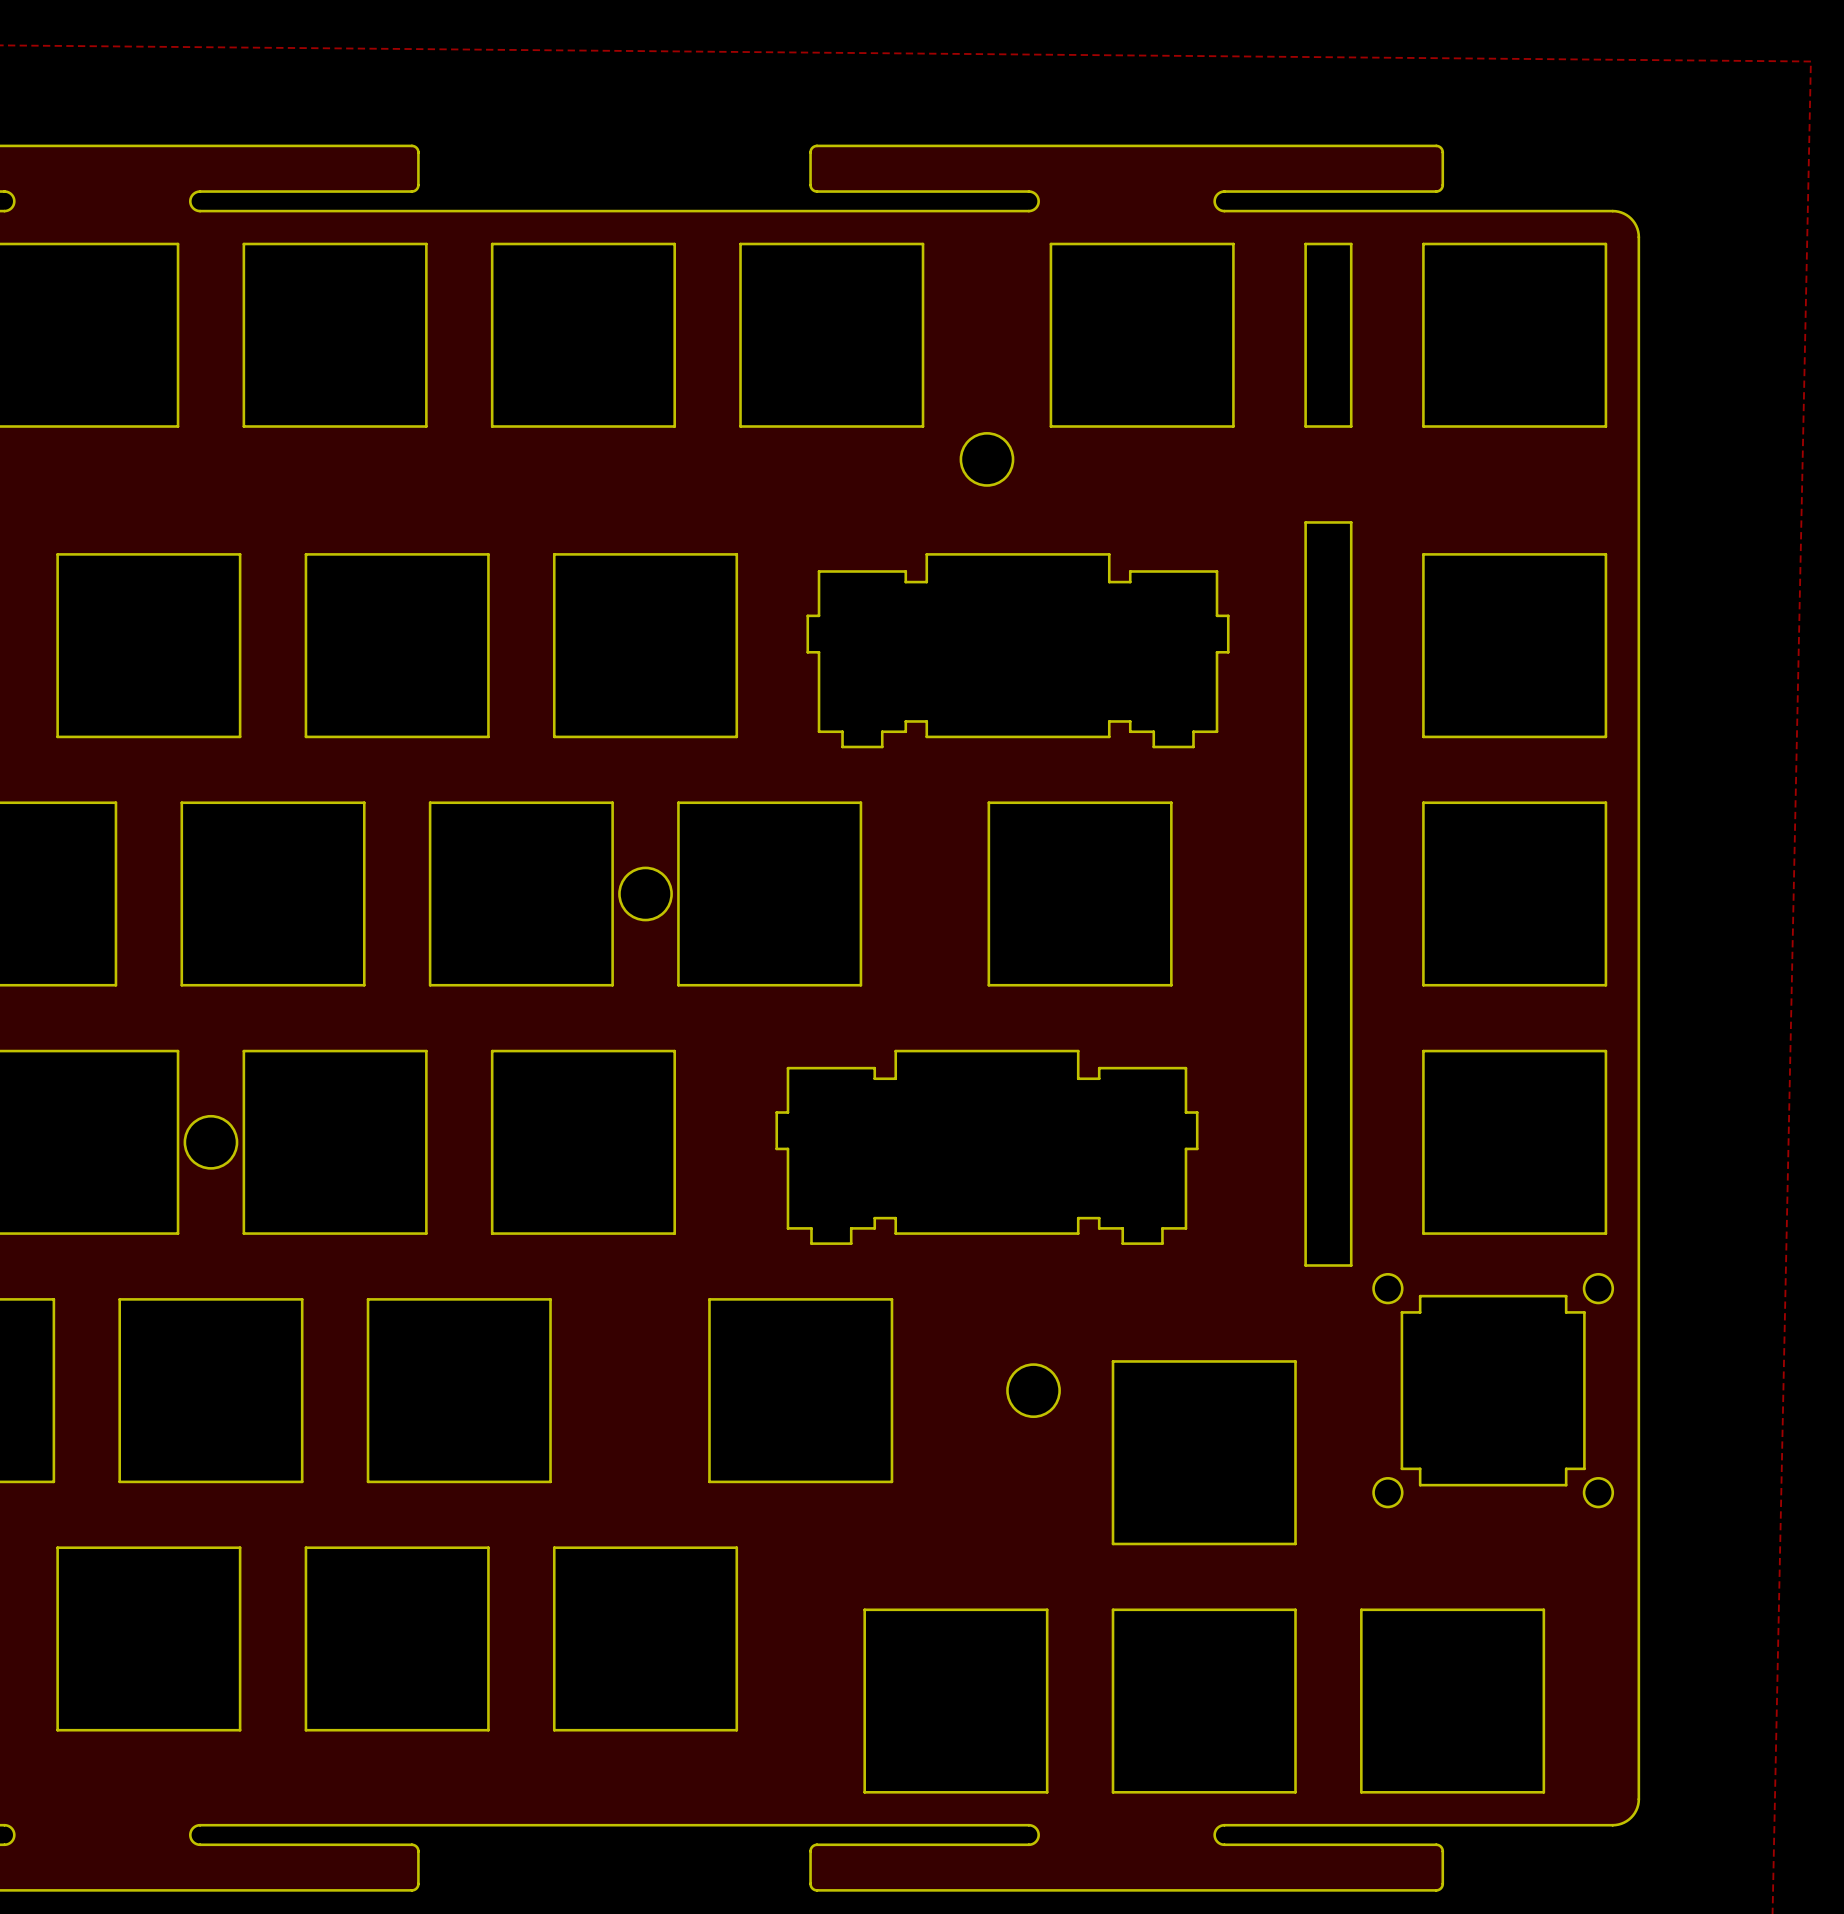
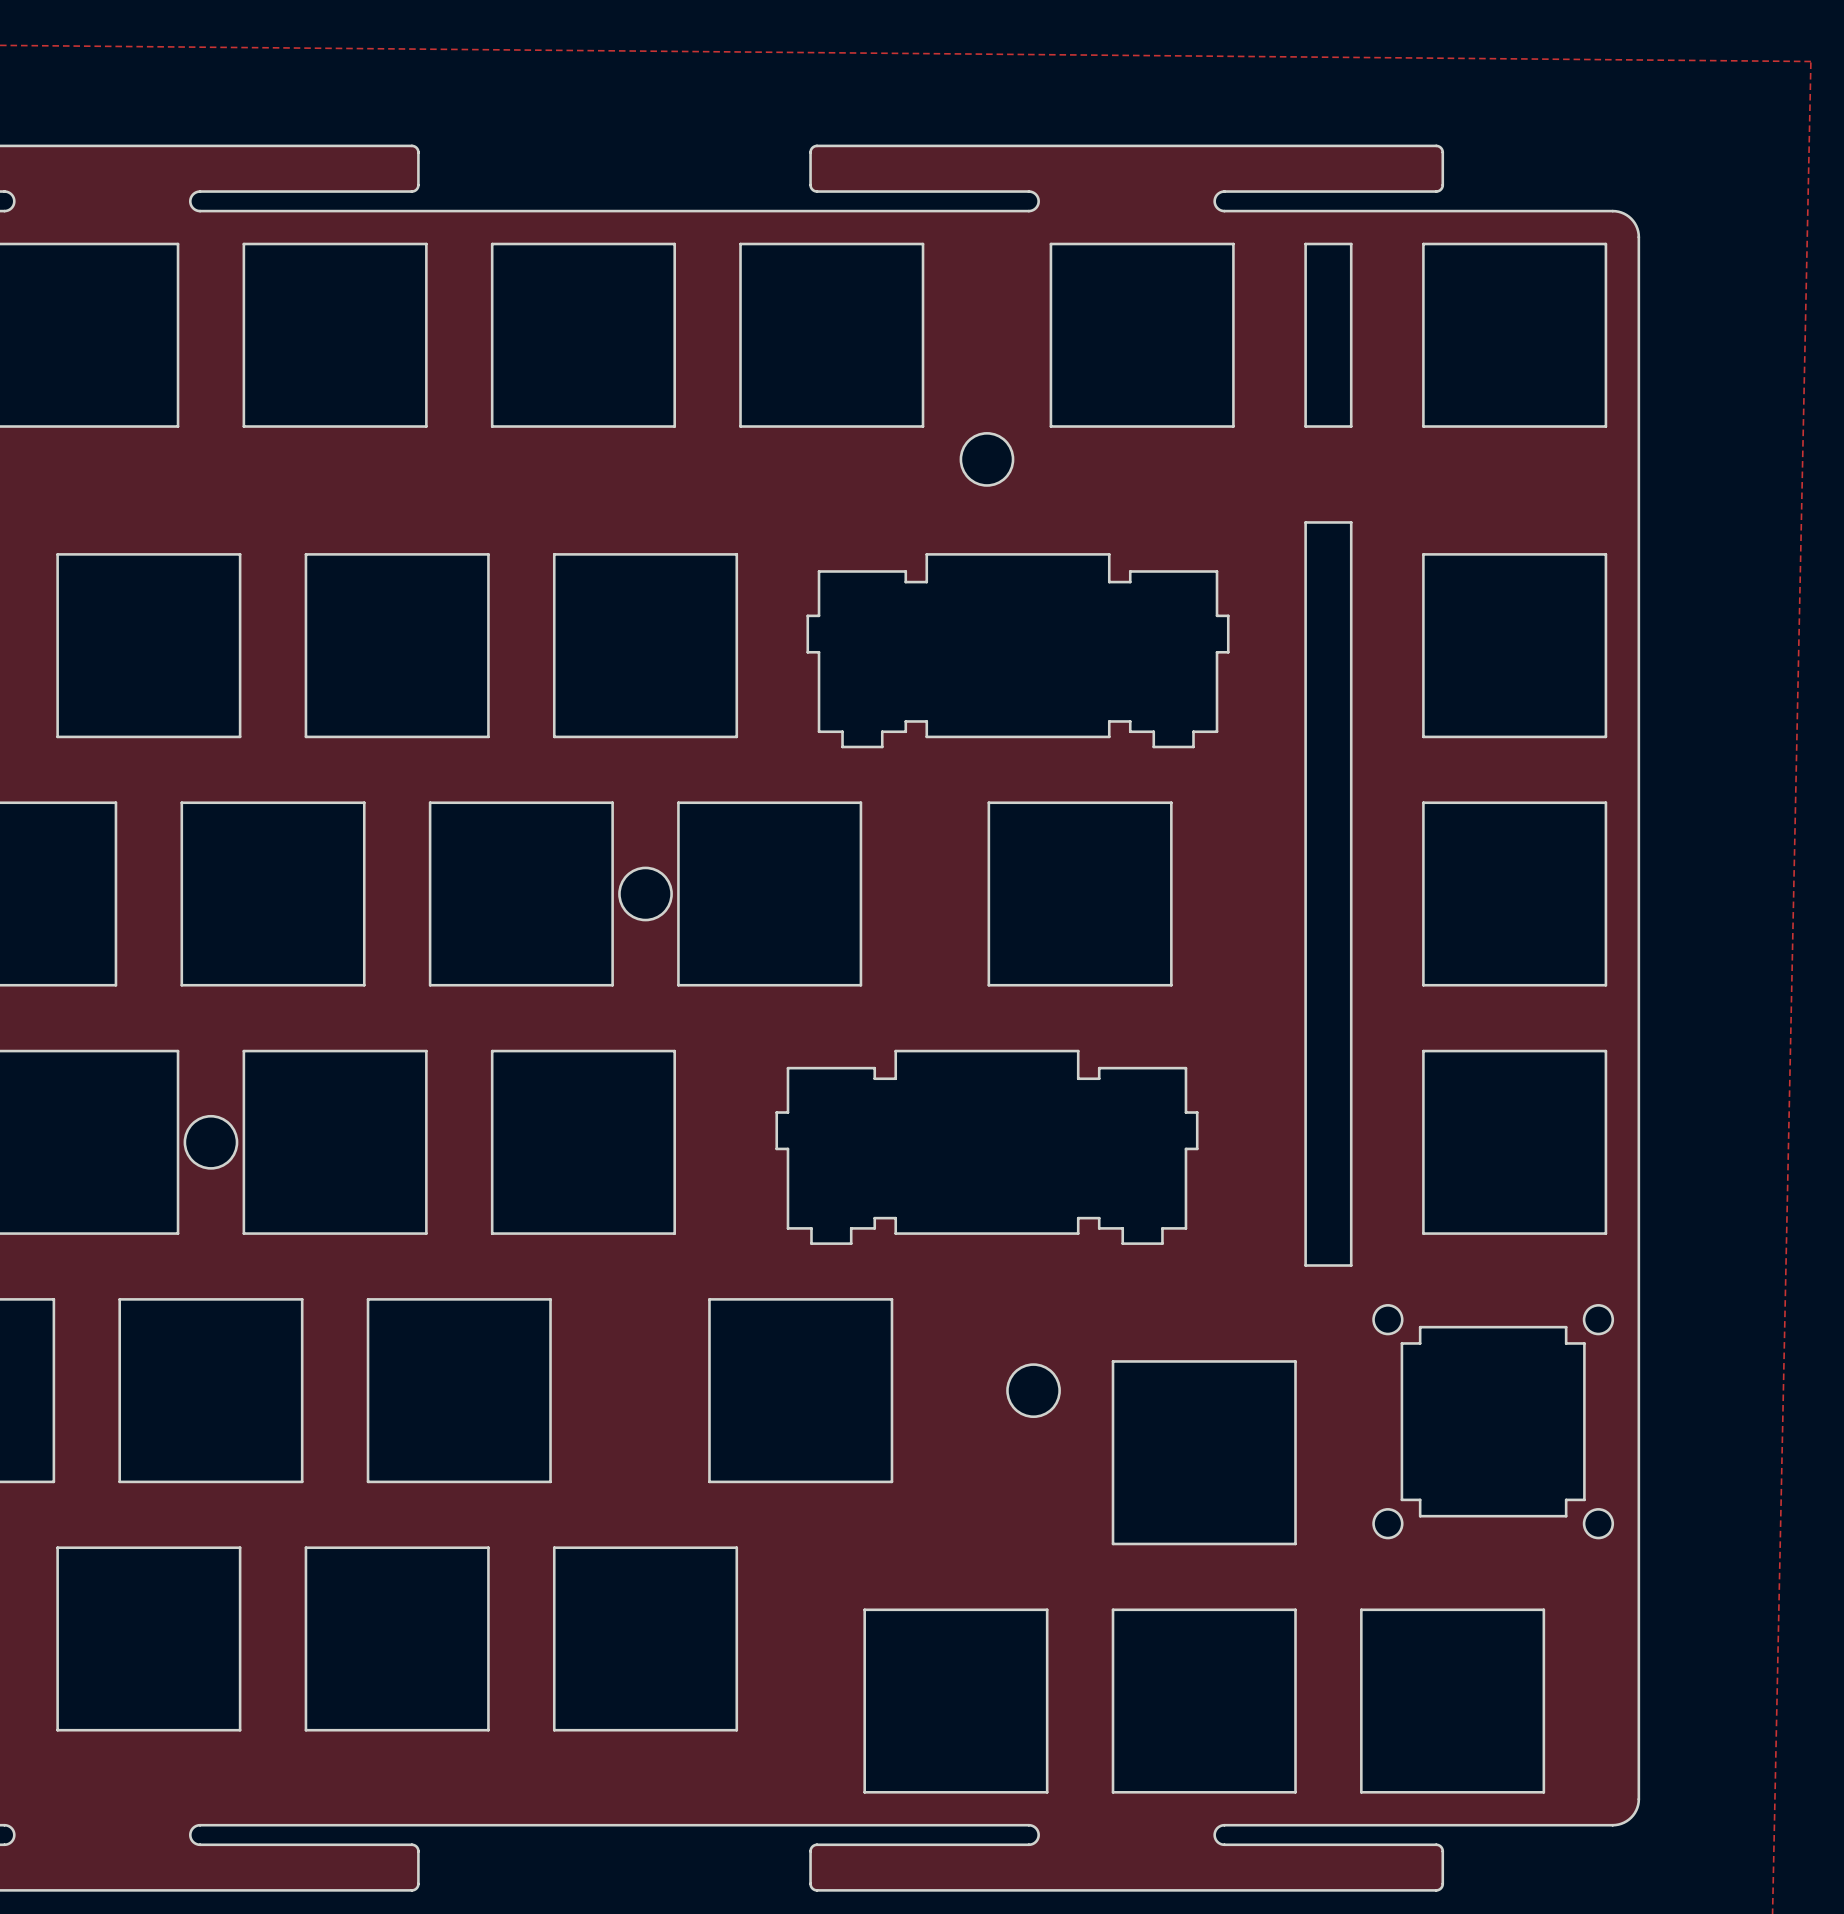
round board edge position: (1387, 1288) -> (1387, 1319)
round board edge position: (1598, 1288) -> (1598, 1319)
board edge: (1420, 1296) (1420, 1312) (1401, 1312) (1401, 1468) (1420, 1468) (1420, 1485) (1566, 1485) (1566, 1468) (1584, 1468) (1584, 1312) (1566, 1312) (1566, 1296) (1420, 1296) -> (1420, 1327) (1420, 1343) (1401, 1343) (1401, 1499) (1420, 1499) (1420, 1516) (1566, 1516) (1566, 1499) (1584, 1499) (1584, 1343) (1566, 1343) (1566, 1327) (1420, 1327)
round board edge position: (1387, 1492) -> (1387, 1523)
round board edge position: (1598, 1492) -> (1598, 1523)

